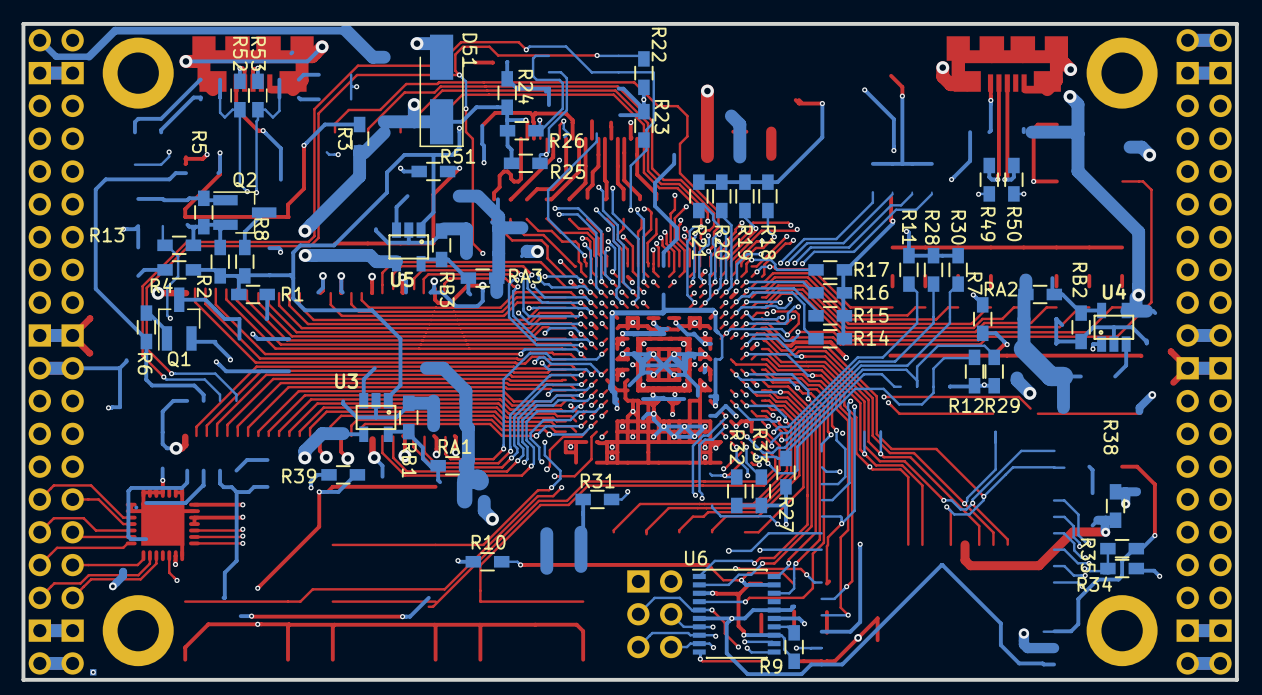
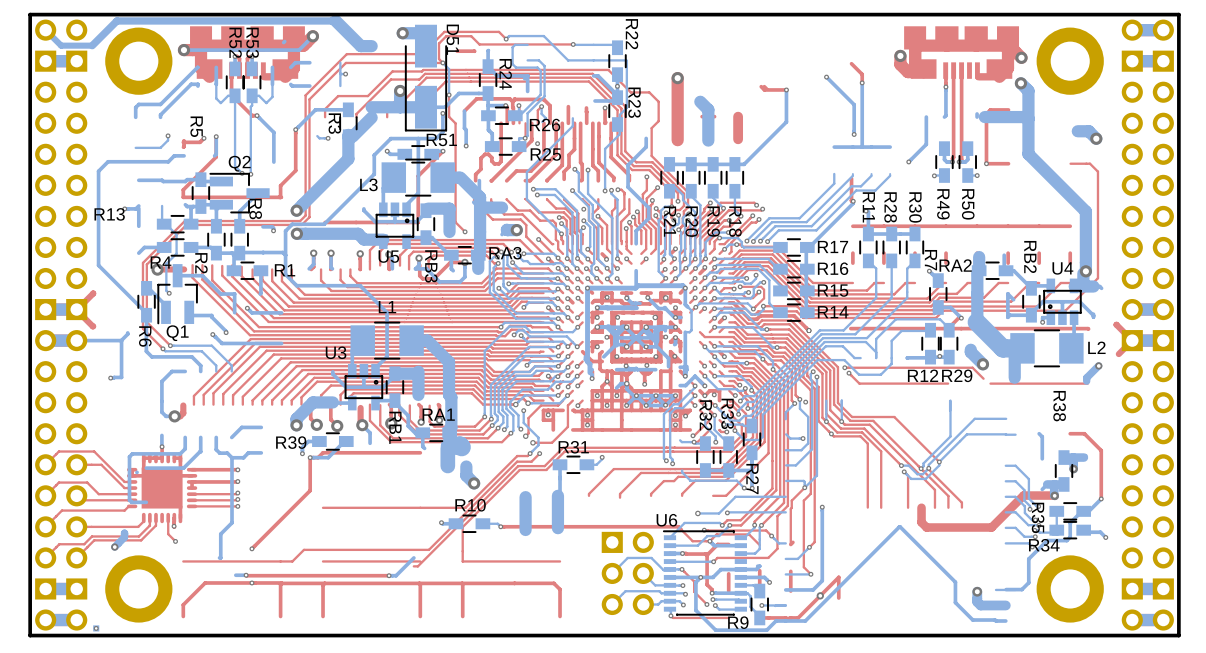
L3: none -> (418, 177)
L1: none -> (387, 340)
bottom track: (1080, 376) (1063, 376) -> none
L2: none -> (1046, 348)

